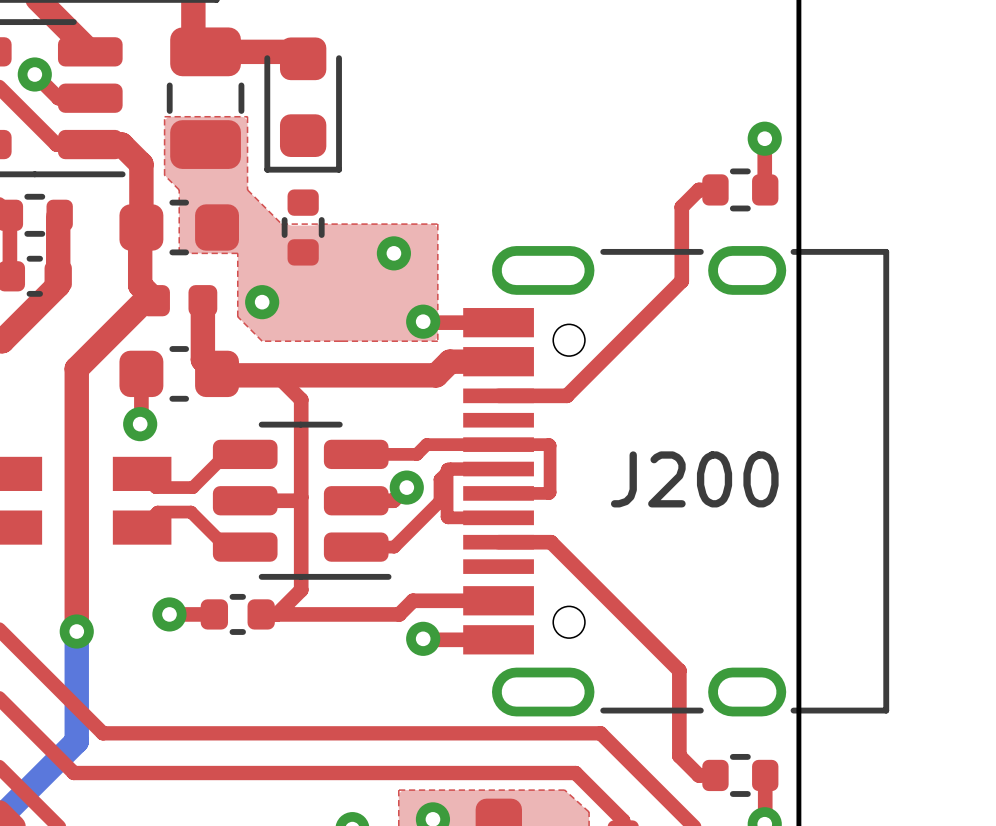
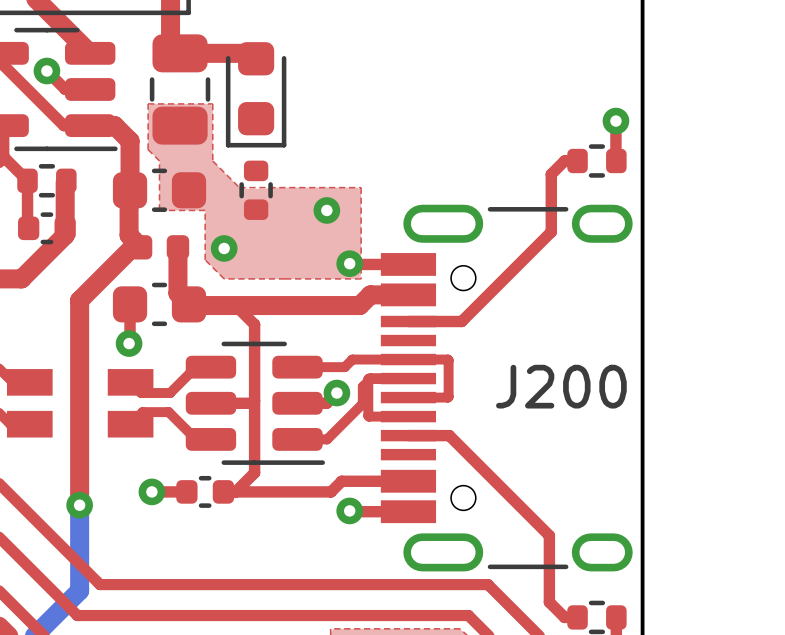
J200 footprint: [463, 246, 890, 717] -> [380, 204, 633, 572]

